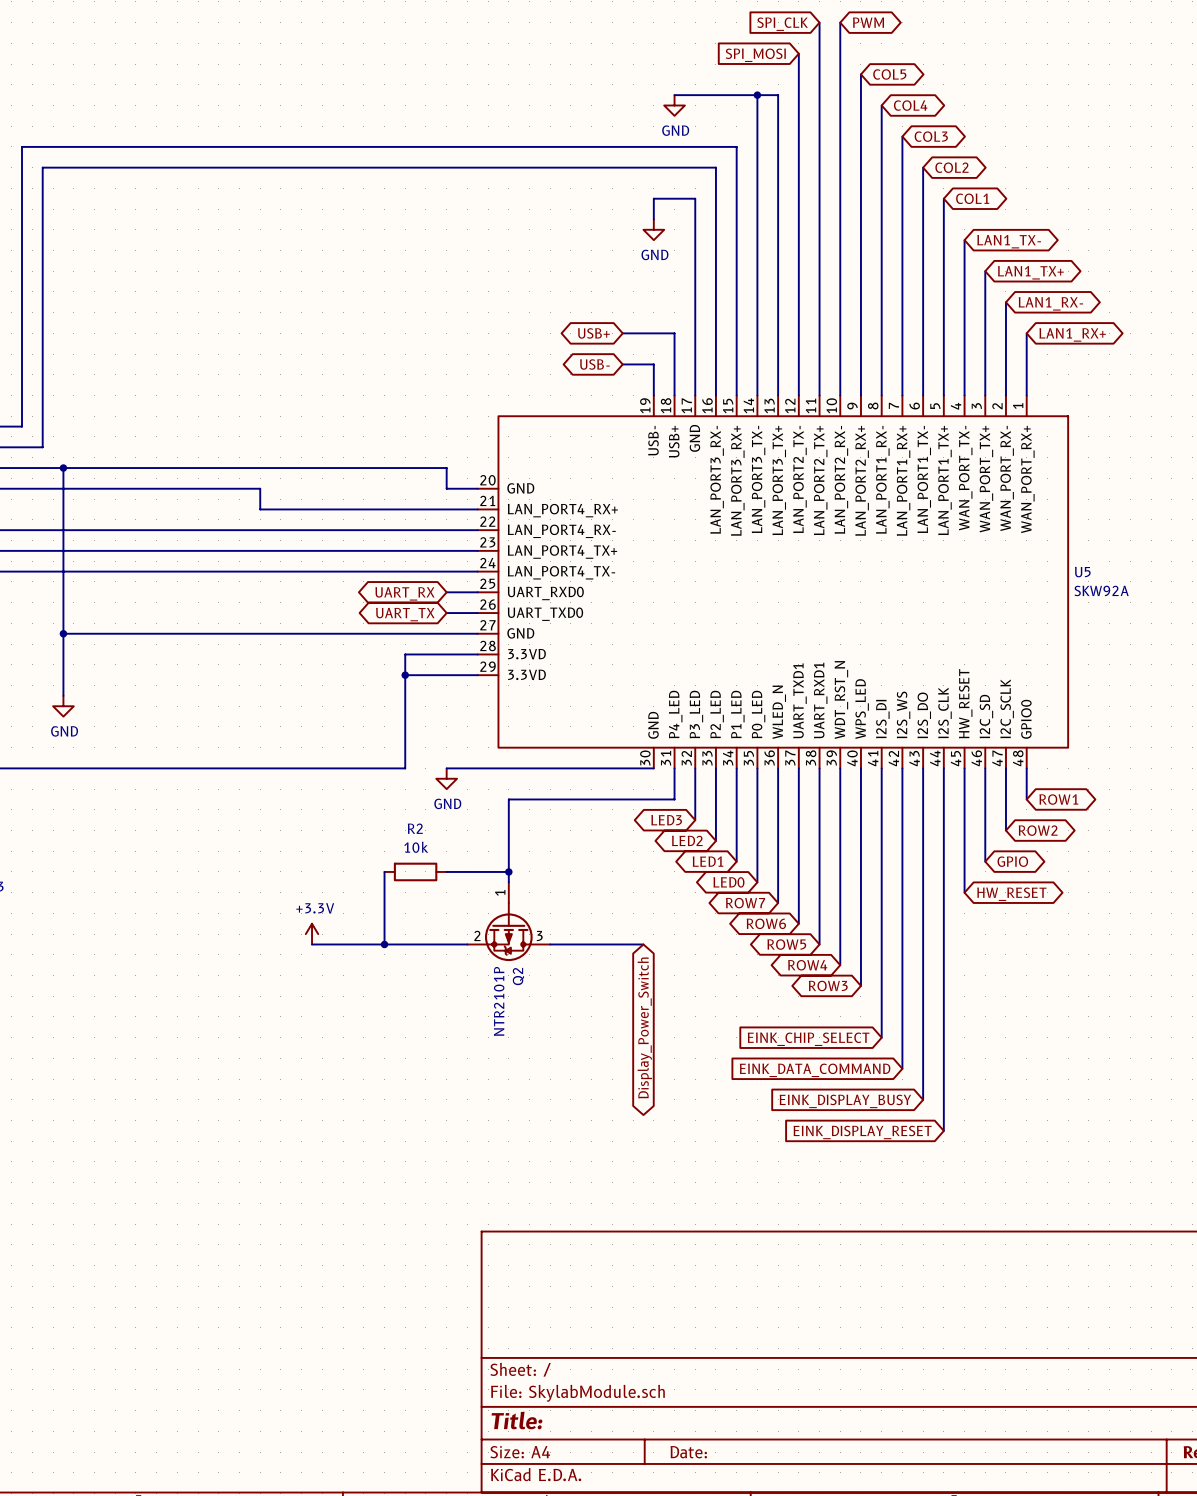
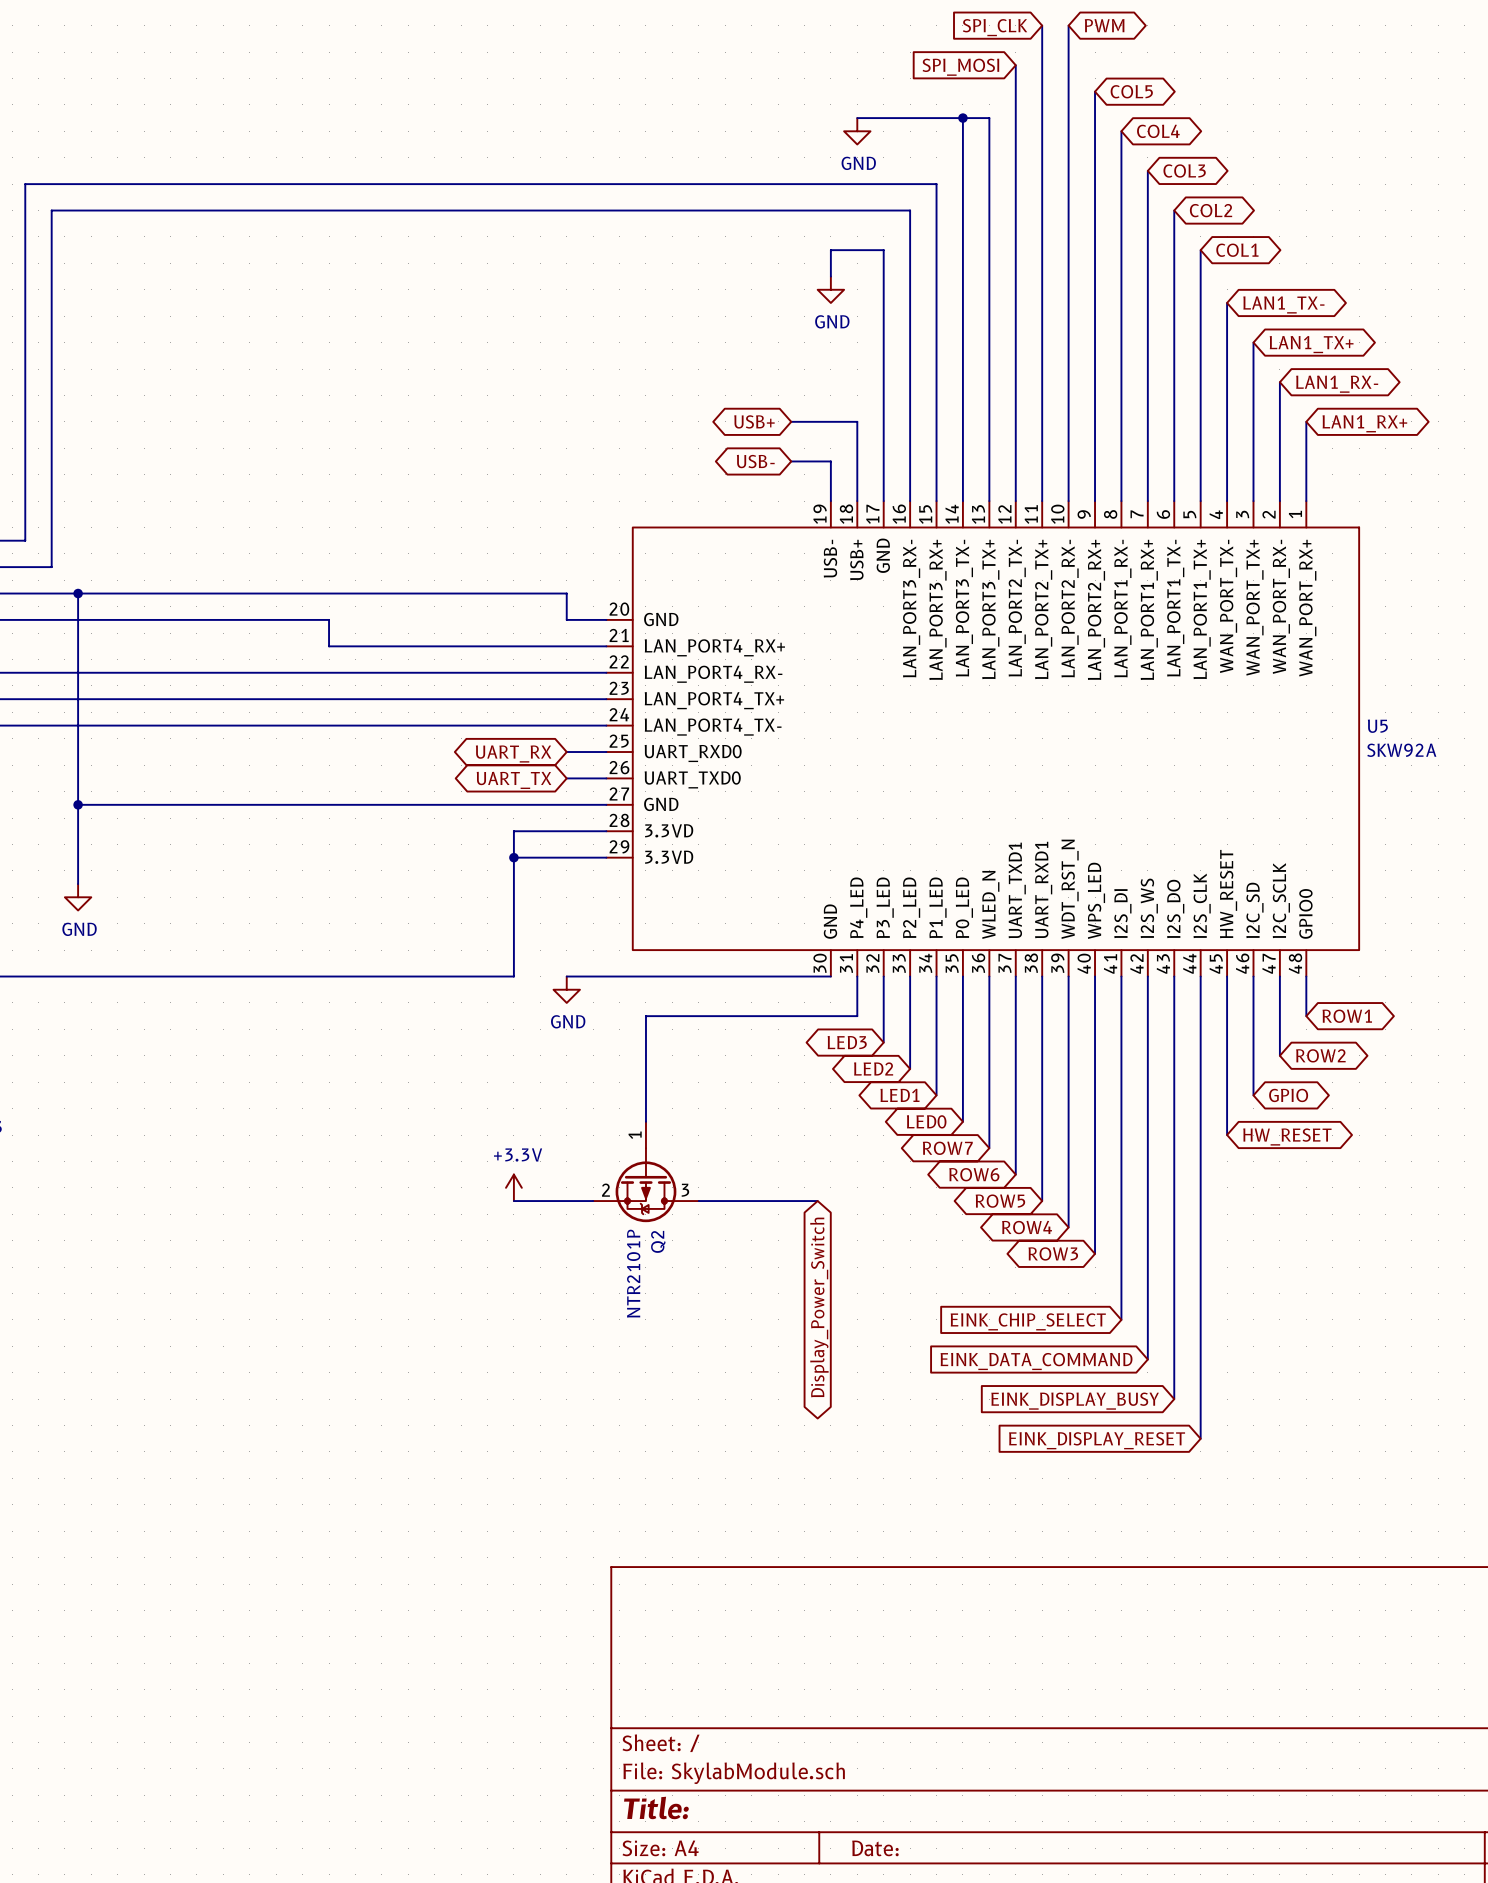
wire: (384, 871) (384, 944) -> none
R2: 10k (415, 871) -> none
wire: (446, 871) (508, 871) -> none
junction: (508, 871) -> none
power symbol position: +3.3V (312, 934) -> +3.3V (513, 1187)
wire: (312, 944) (405, 944) -> none
junction: (384, 944) -> none

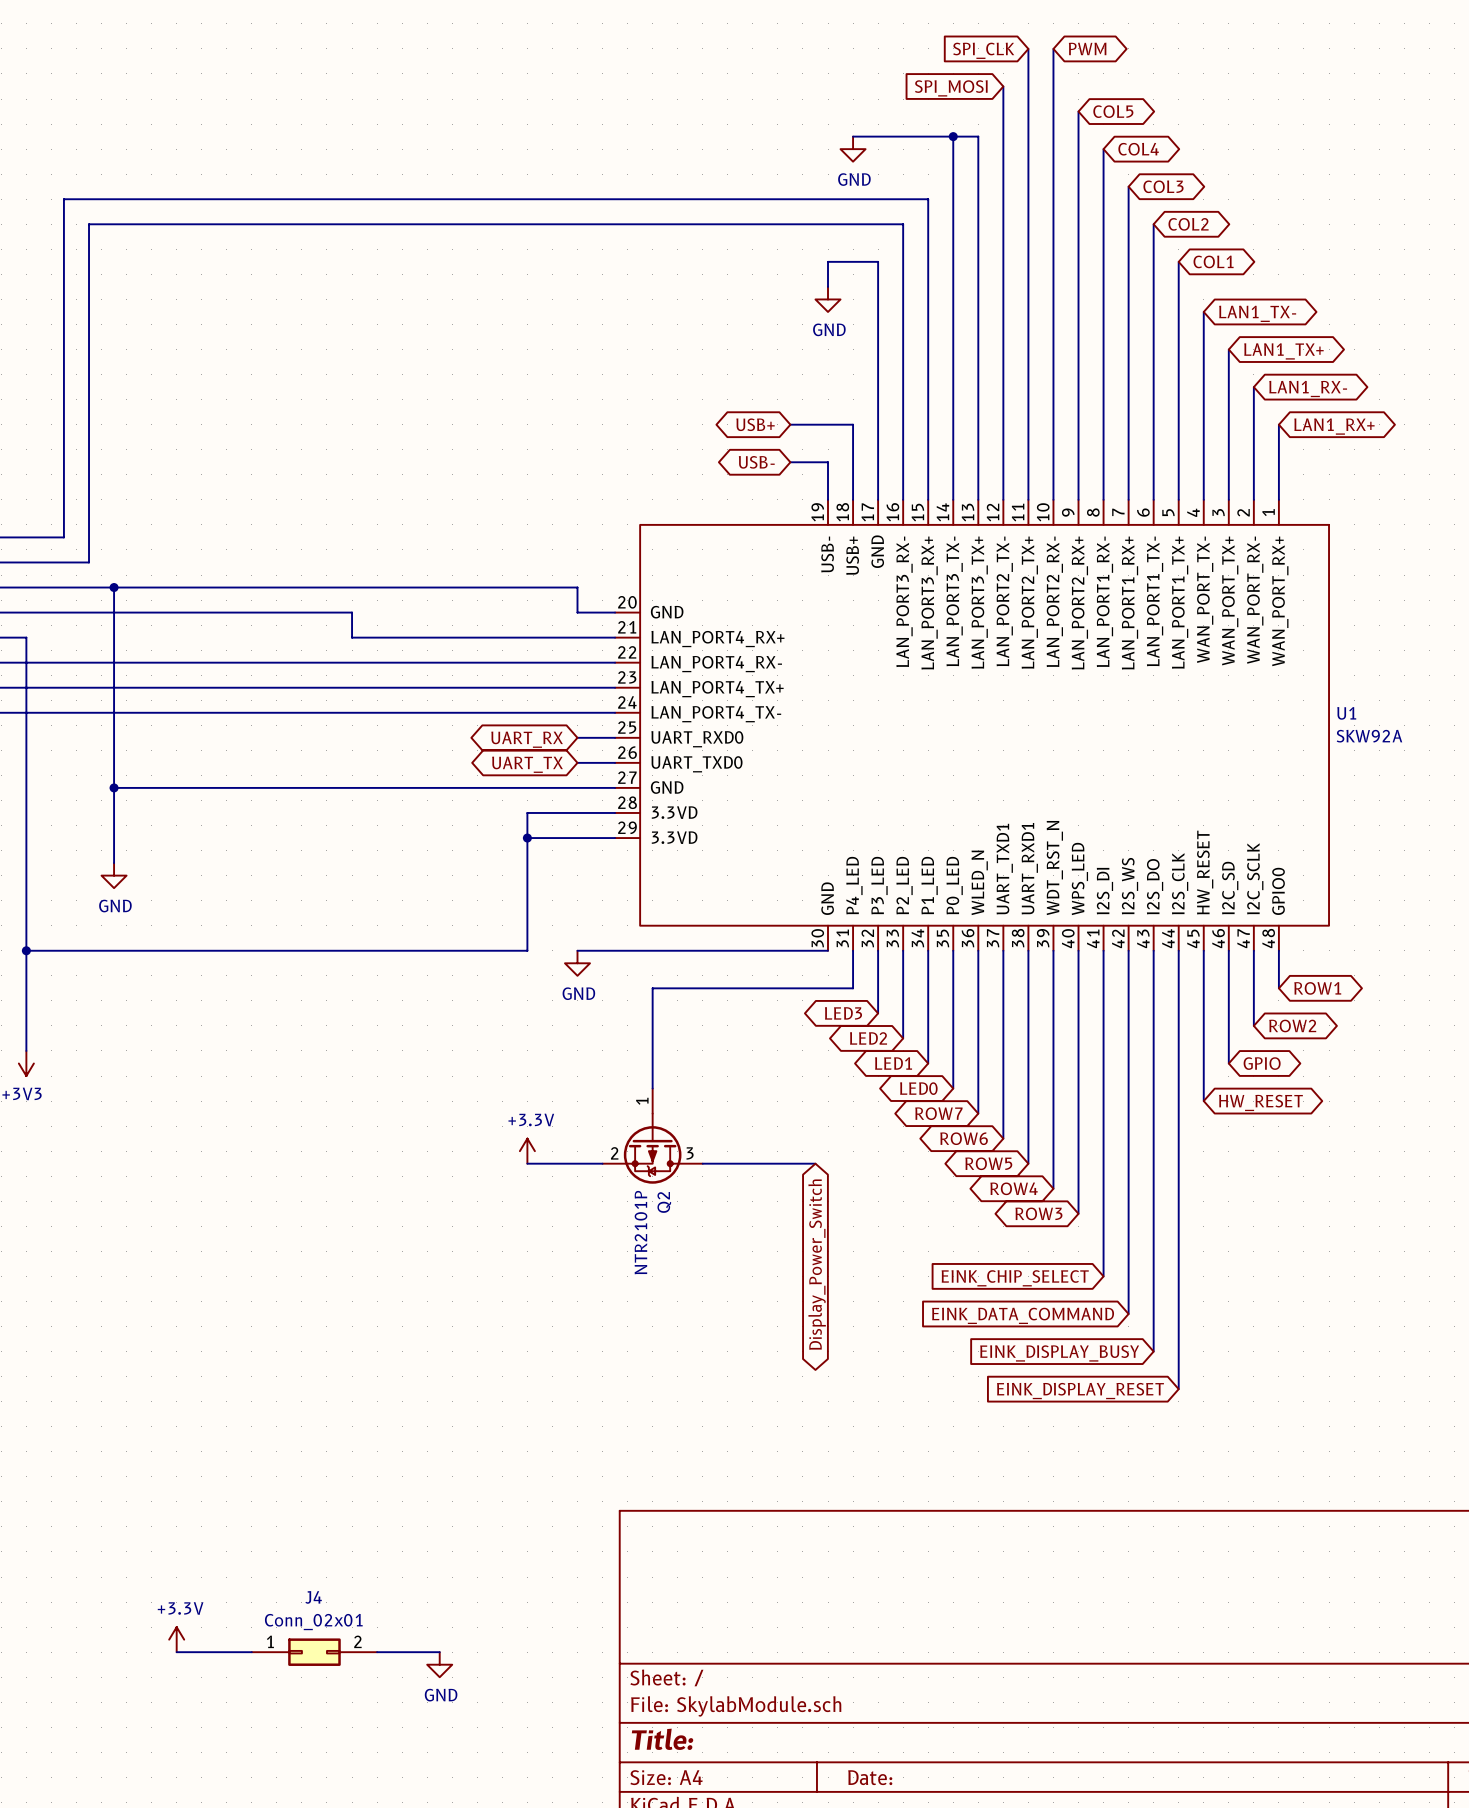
U5 name: U5 (1377, 726) -> U1 (1346, 713)
power symbol: none -> +3.3V (176, 1639)
wire: none -> (176, 1652) (251, 1652)
J4: none -> Conn_02x01 (314, 1652)
wire: none -> (377, 1652) (439, 1652)
power symbol: none -> GND (439, 1664)

